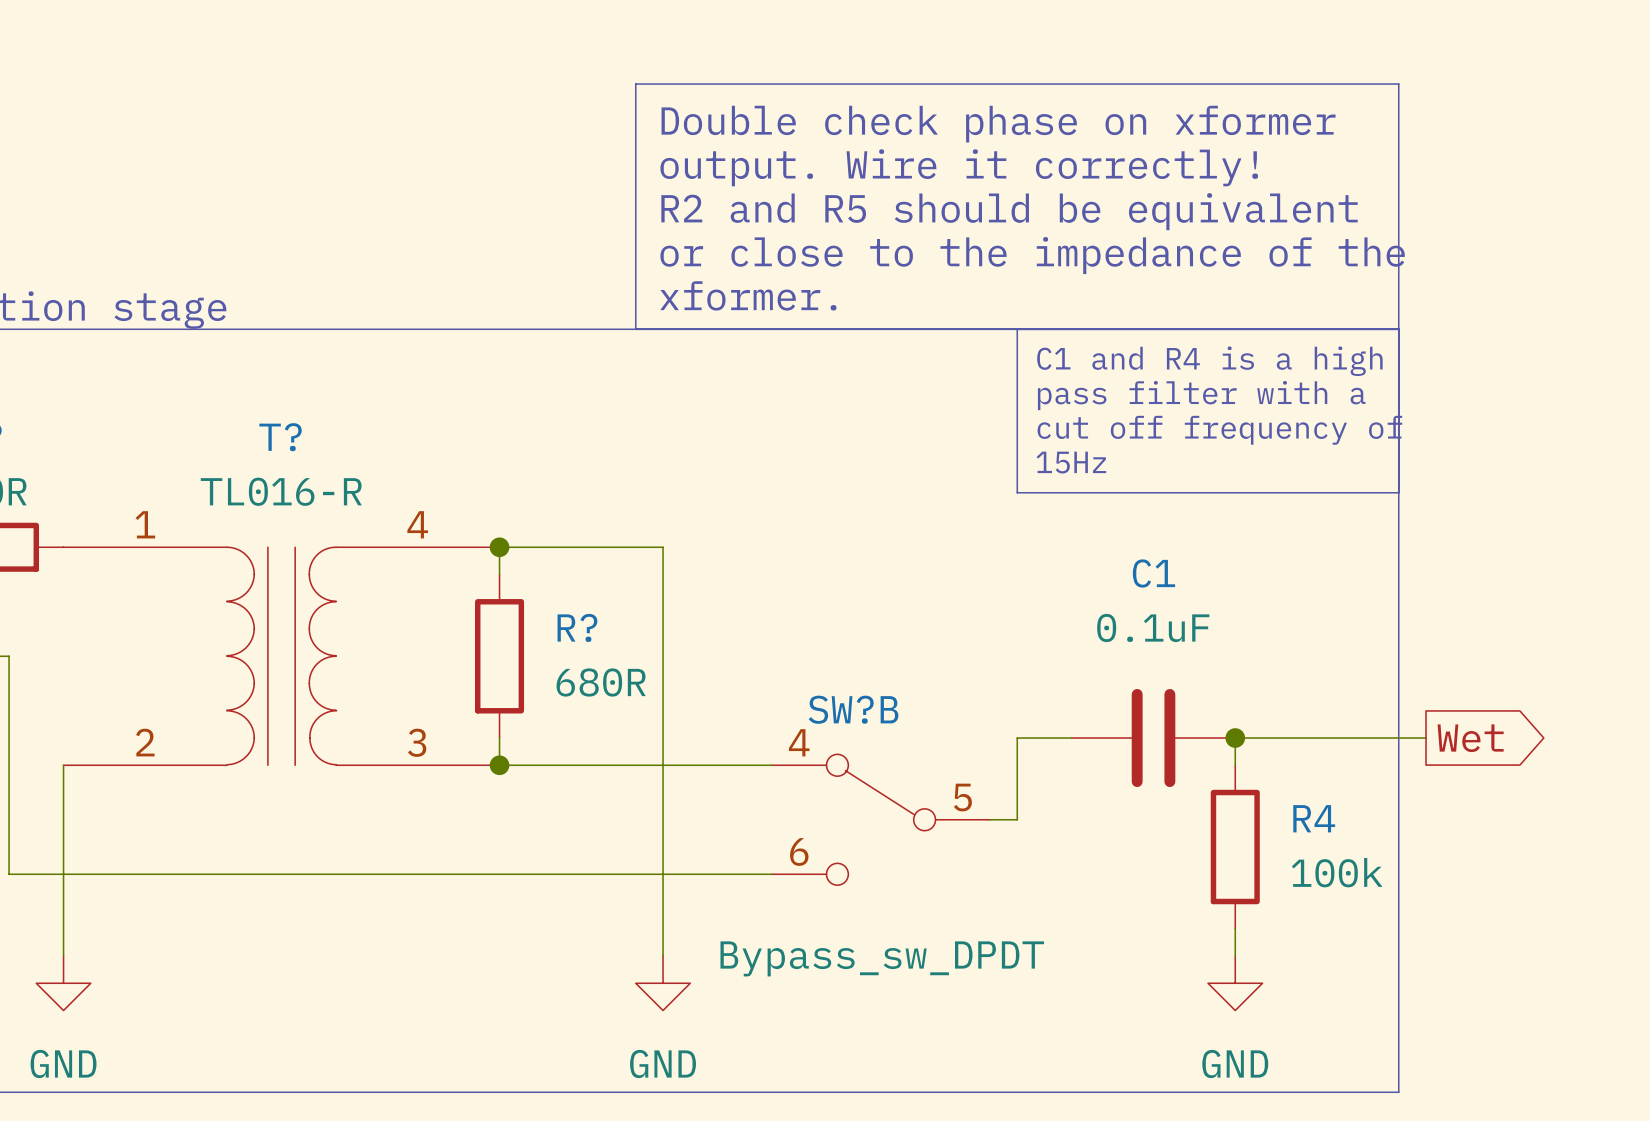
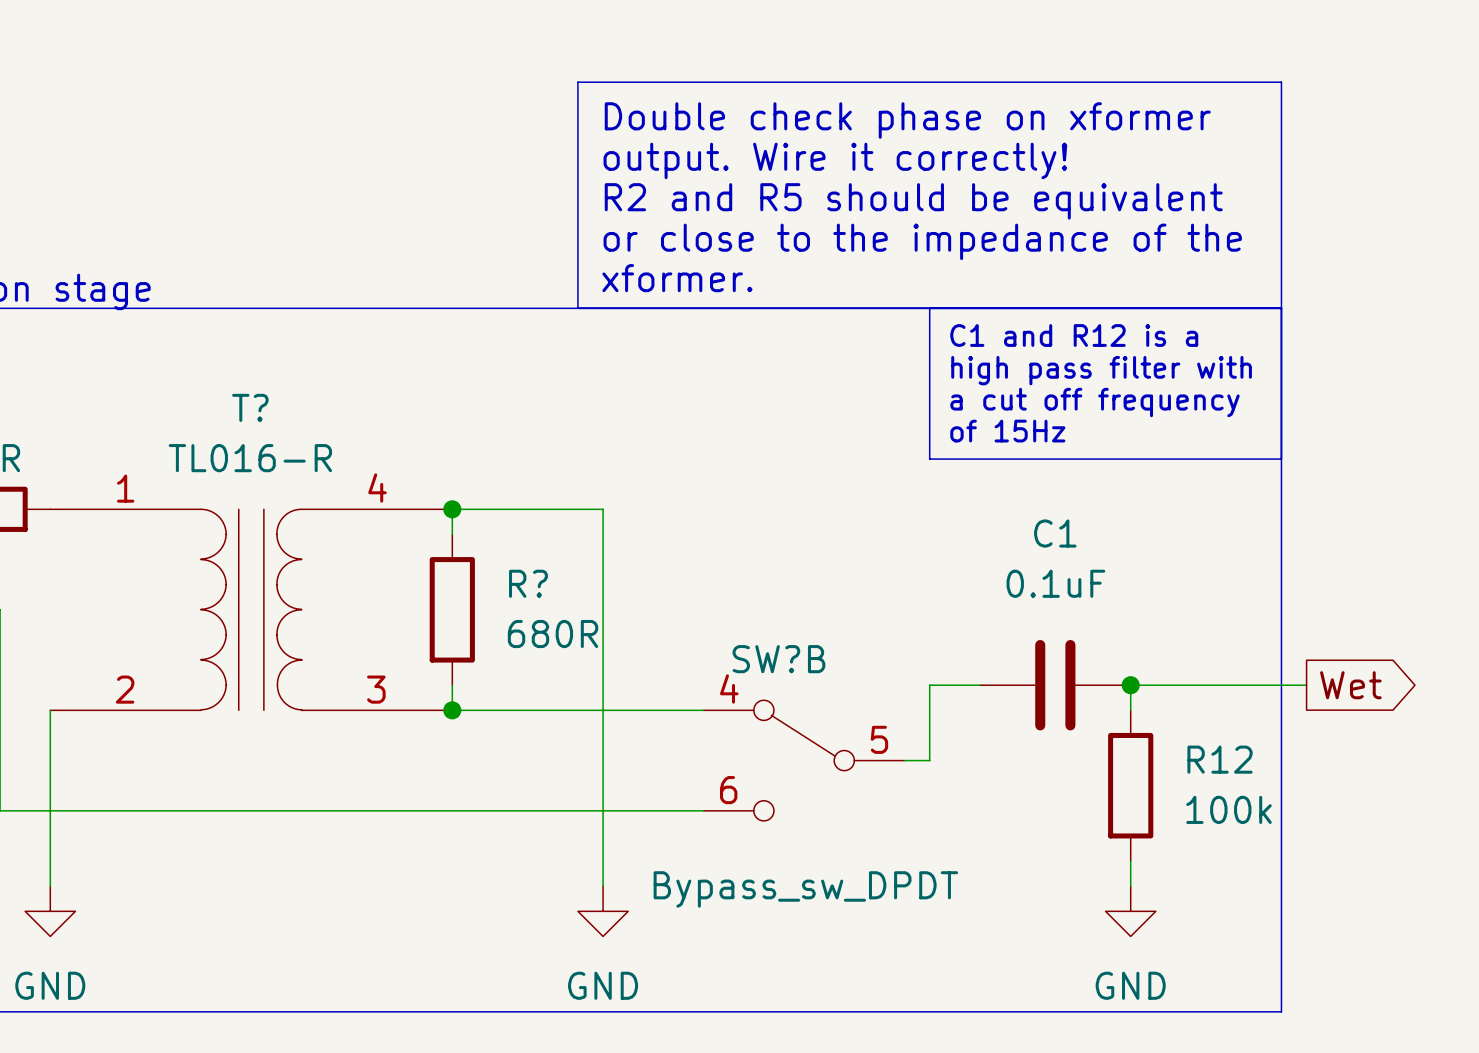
text: C1 and R4 is a high (1209, 361) -> C1 and R12 is a (1074, 335)
text: pass filter with a (1201, 395) -> high pass filter with (1101, 370)
text: cut off frequency of (1219, 430) -> a cut off frequency (1094, 402)
text: 15Hz (1071, 462) -> of 15Hz (1007, 431)
R4 name: R4 (1314, 818) -> R12 (1220, 759)

